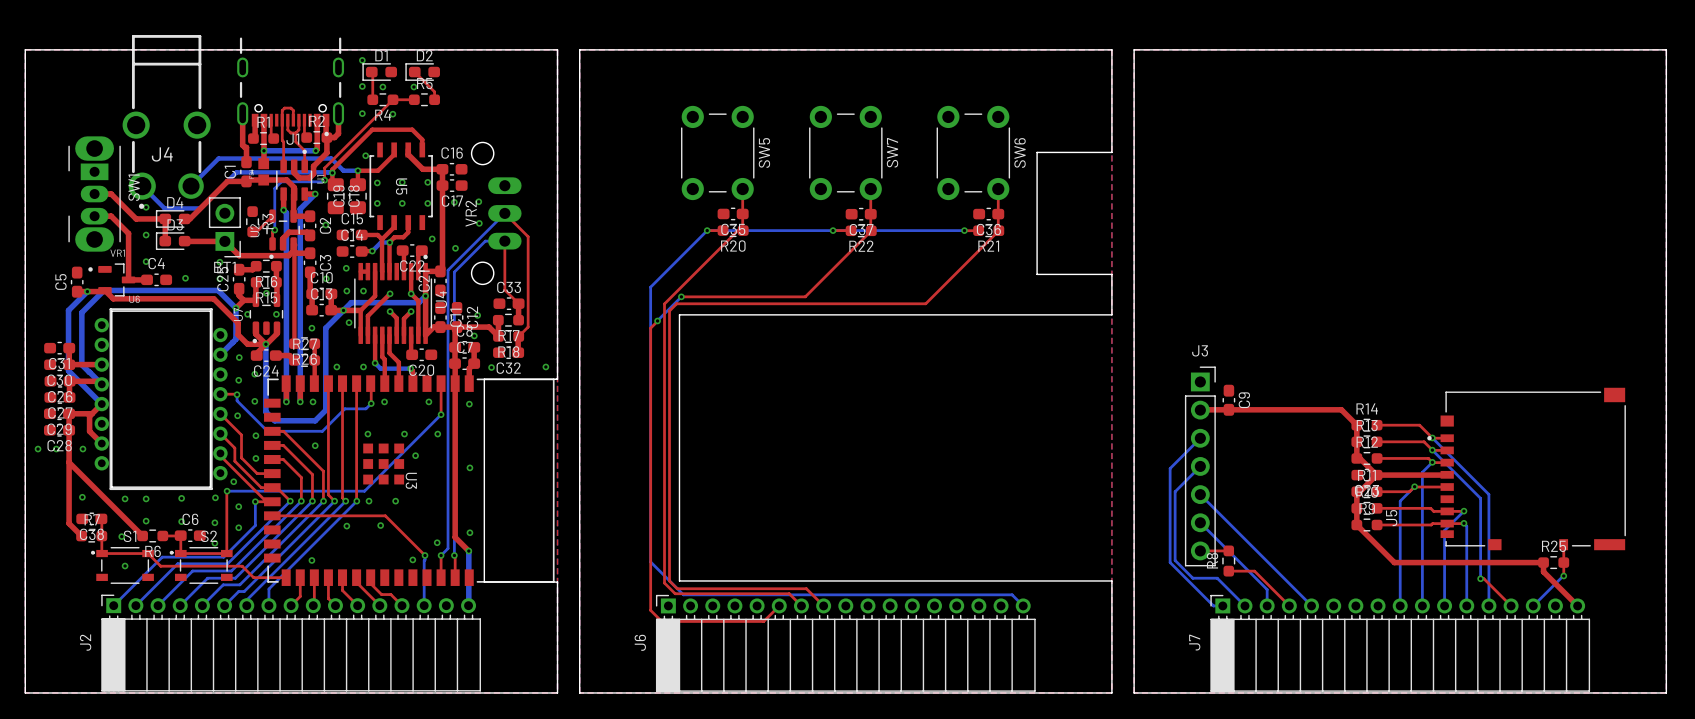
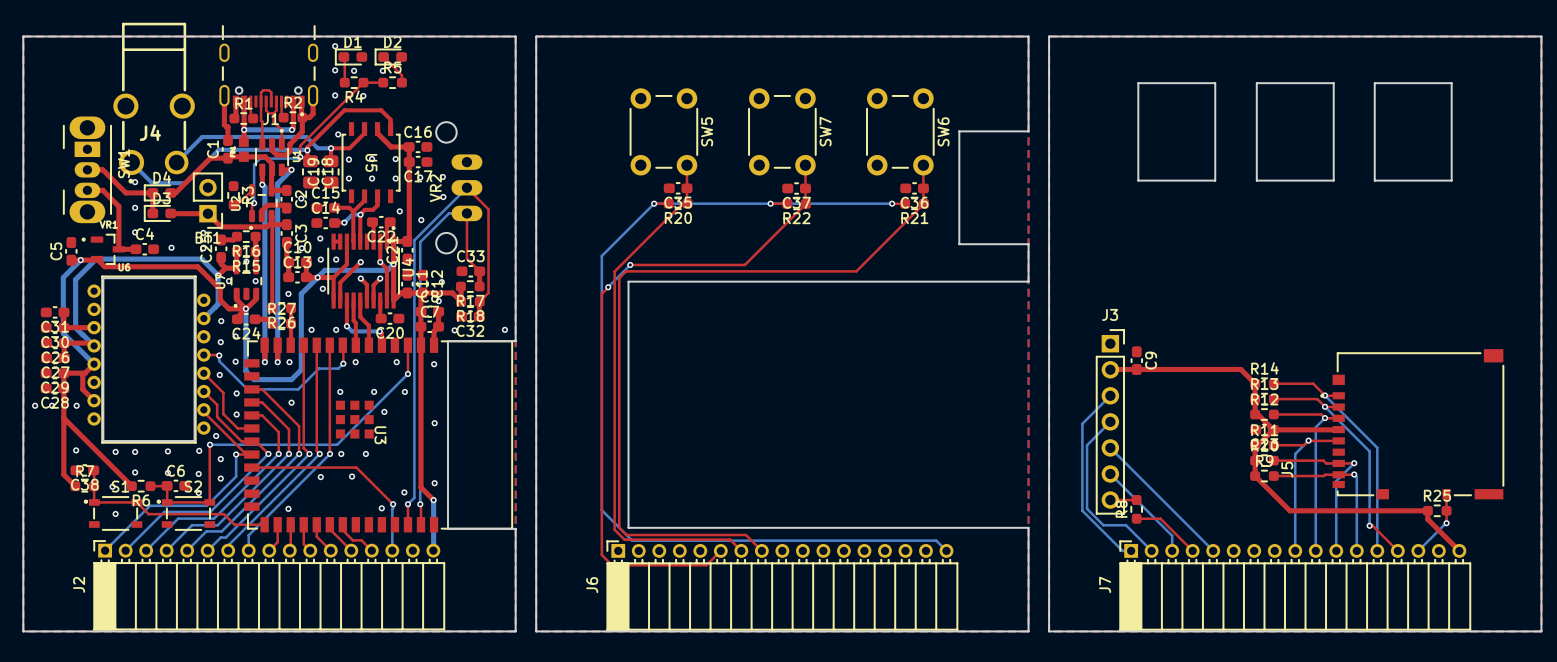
board edge: none -> (1138, 83) (1215, 83) (1215, 180) (1138, 180) (1138, 83)
board edge: none -> (1256, 83) (1333, 83) (1333, 180) (1256, 180) (1256, 83)
board edge: none -> (1374, 83) (1451, 83) (1451, 180) (1374, 180) (1374, 83)

